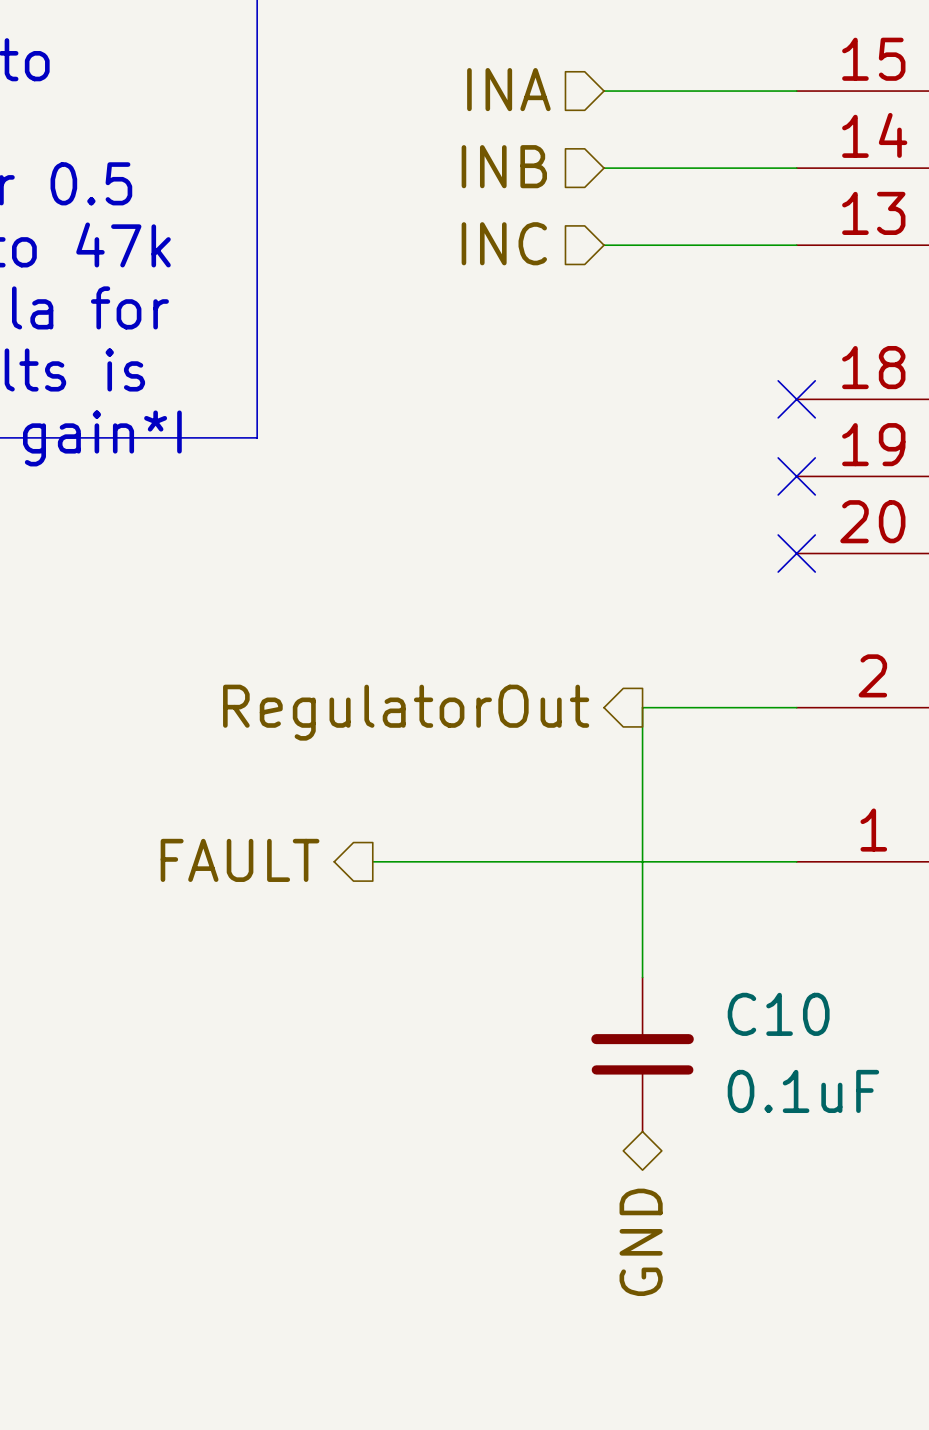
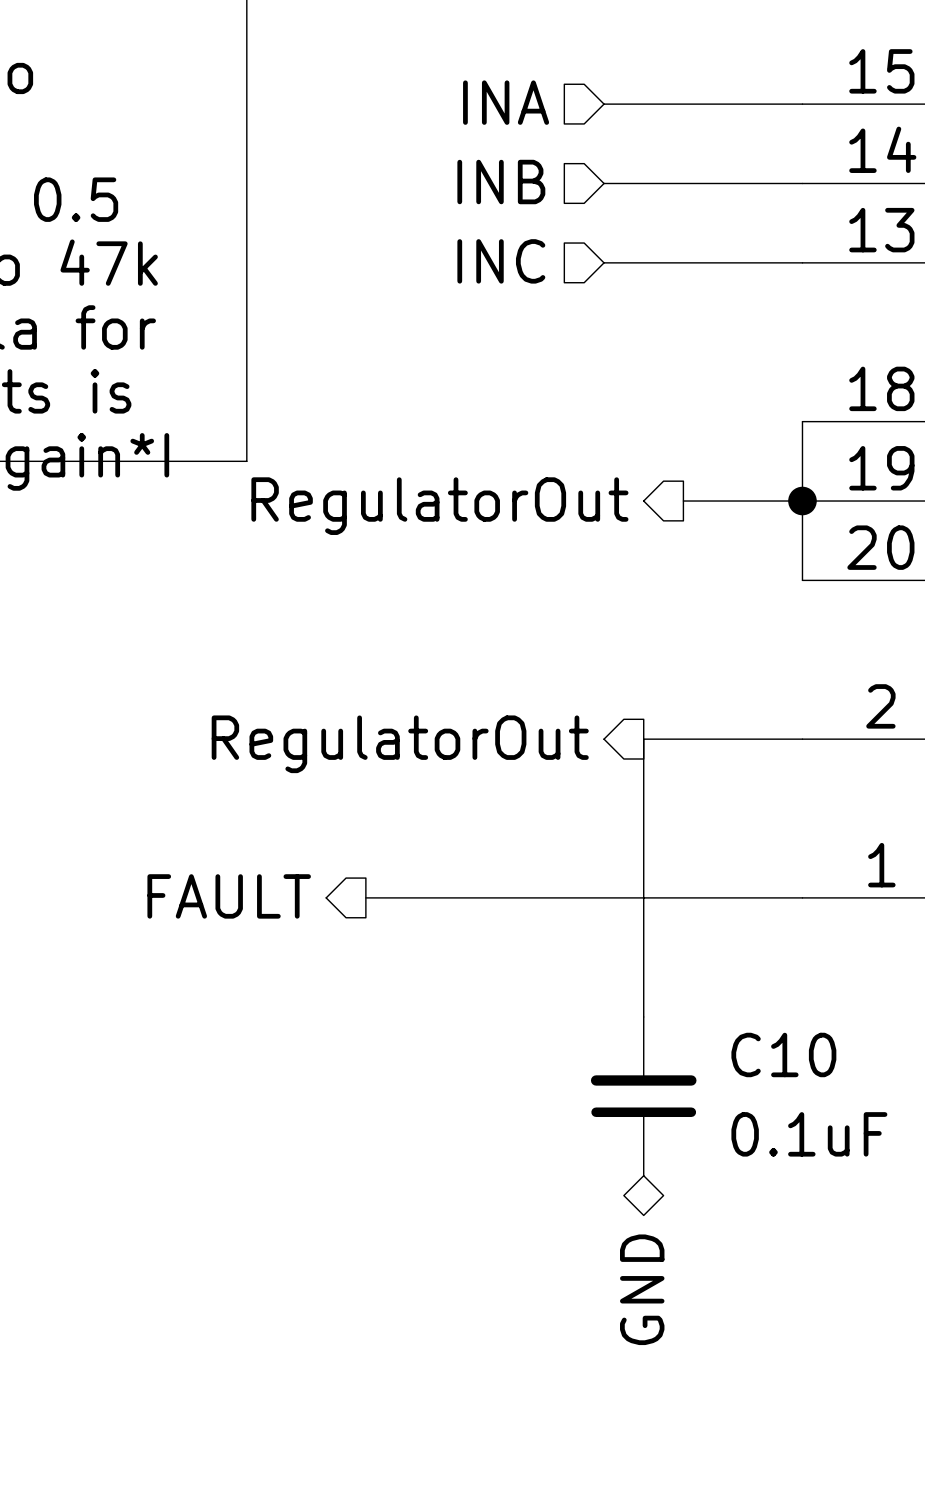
wire: none -> (802, 421) (802, 580)
no-connect mark: (796, 399) -> none
wire: none -> (683, 501) (802, 501)
junction: none -> (802, 501)
no-connect mark: (796, 476) -> none
hierarchical label: none -> RegulatorOut (439, 506)
no-connect mark: (796, 553) -> none

